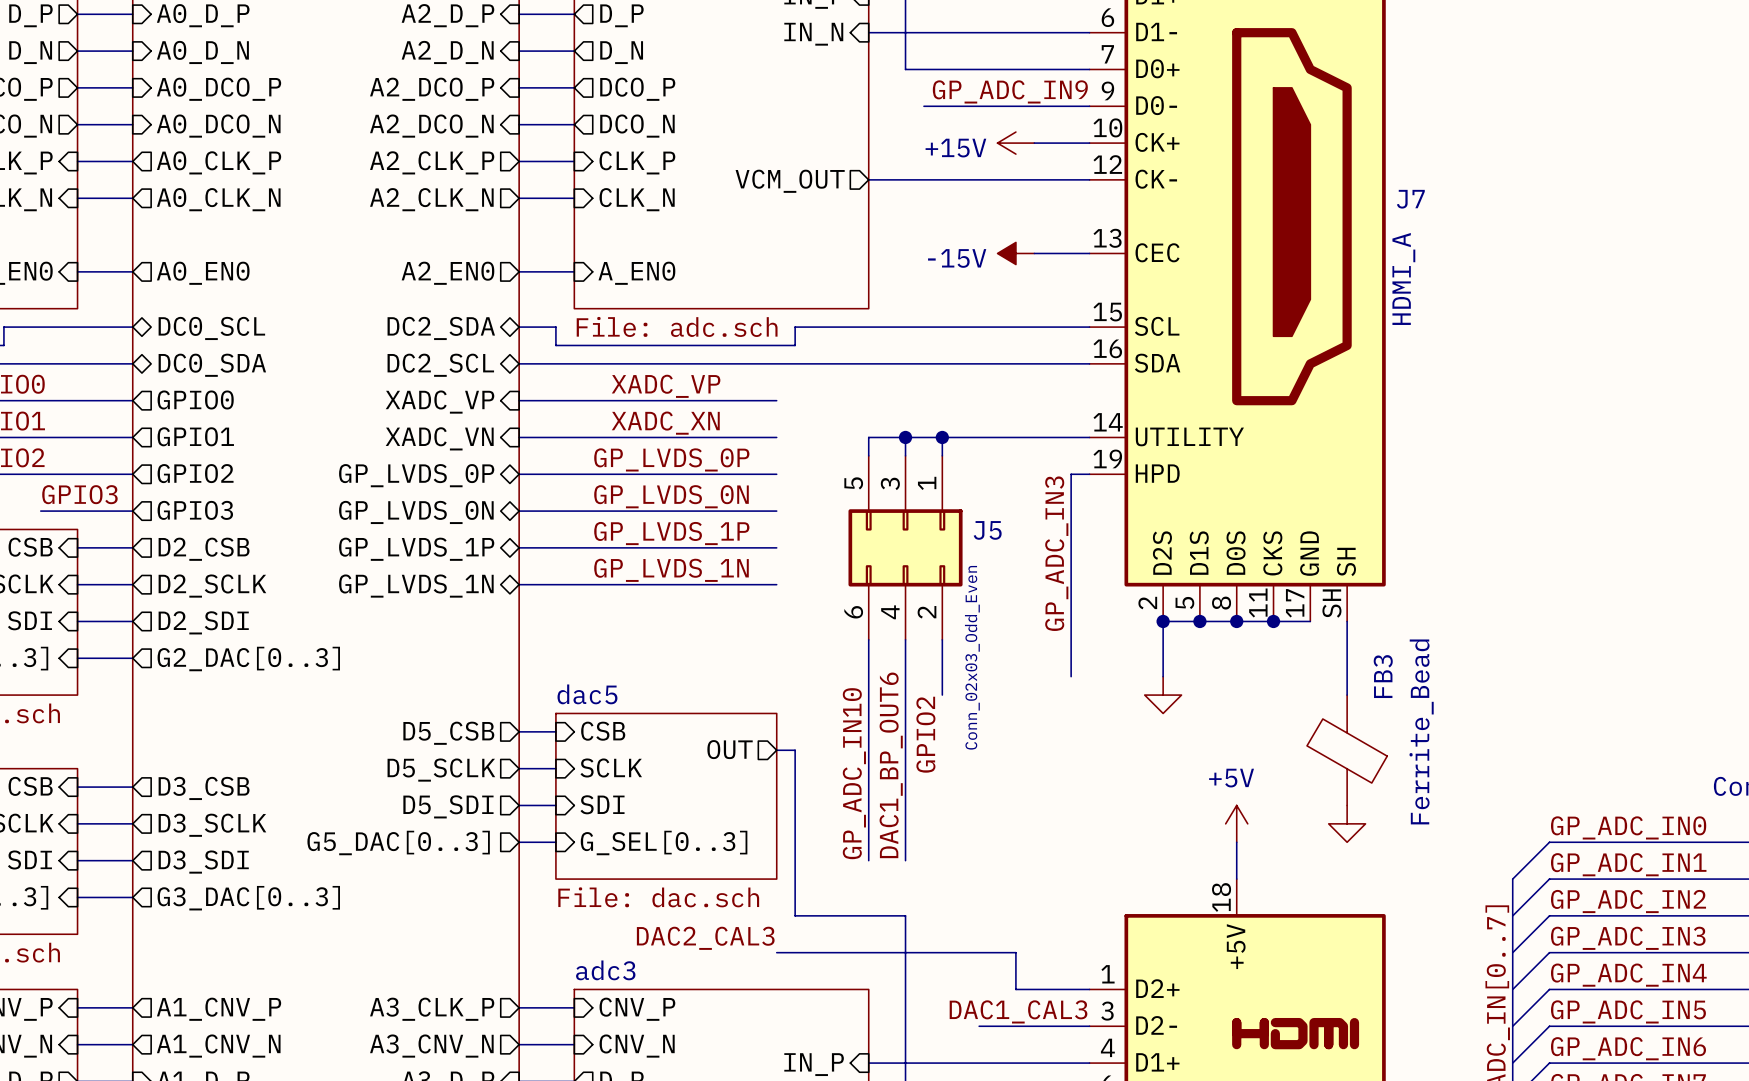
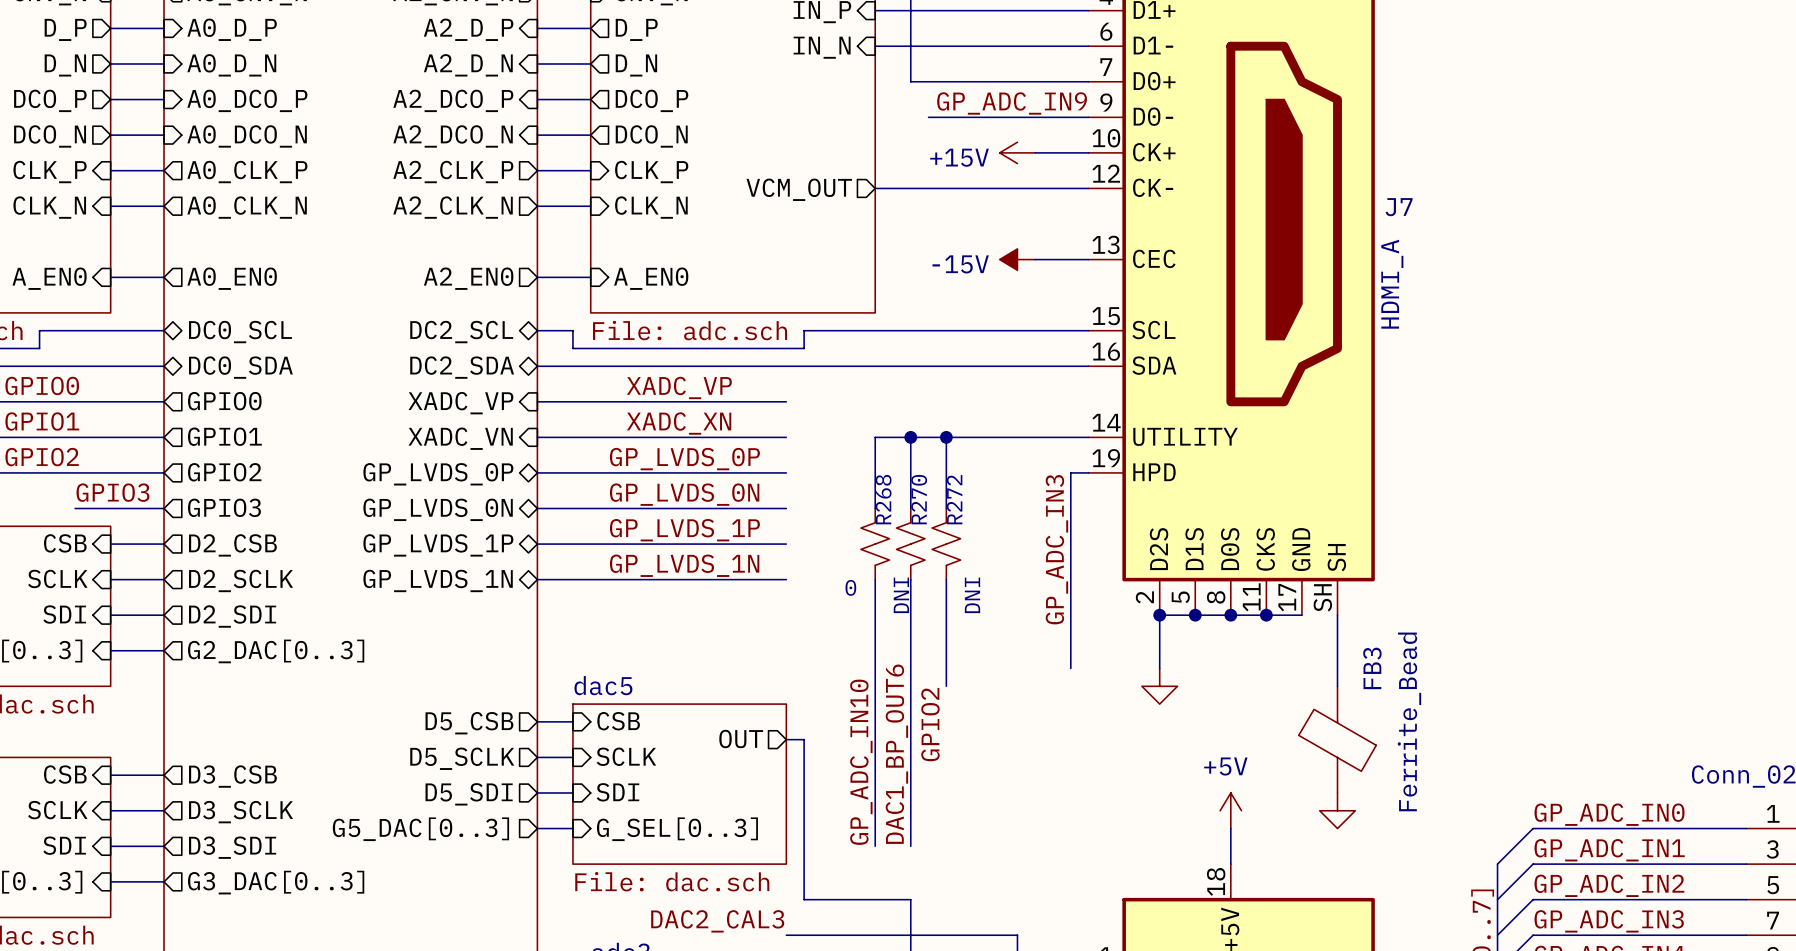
sheet pin: DC2_SDA (441, 328) -> DC2_SCL (461, 332)
sheet pin: DC2_SCL (440, 365) -> DC2_SDA (462, 367)
R268: none -> 0 (875, 544)
J5: Conn_02x03_Odd_Even (905, 547) -> none
R270: none -> DNI (910, 544)
R272: none -> DNI (946, 544)

